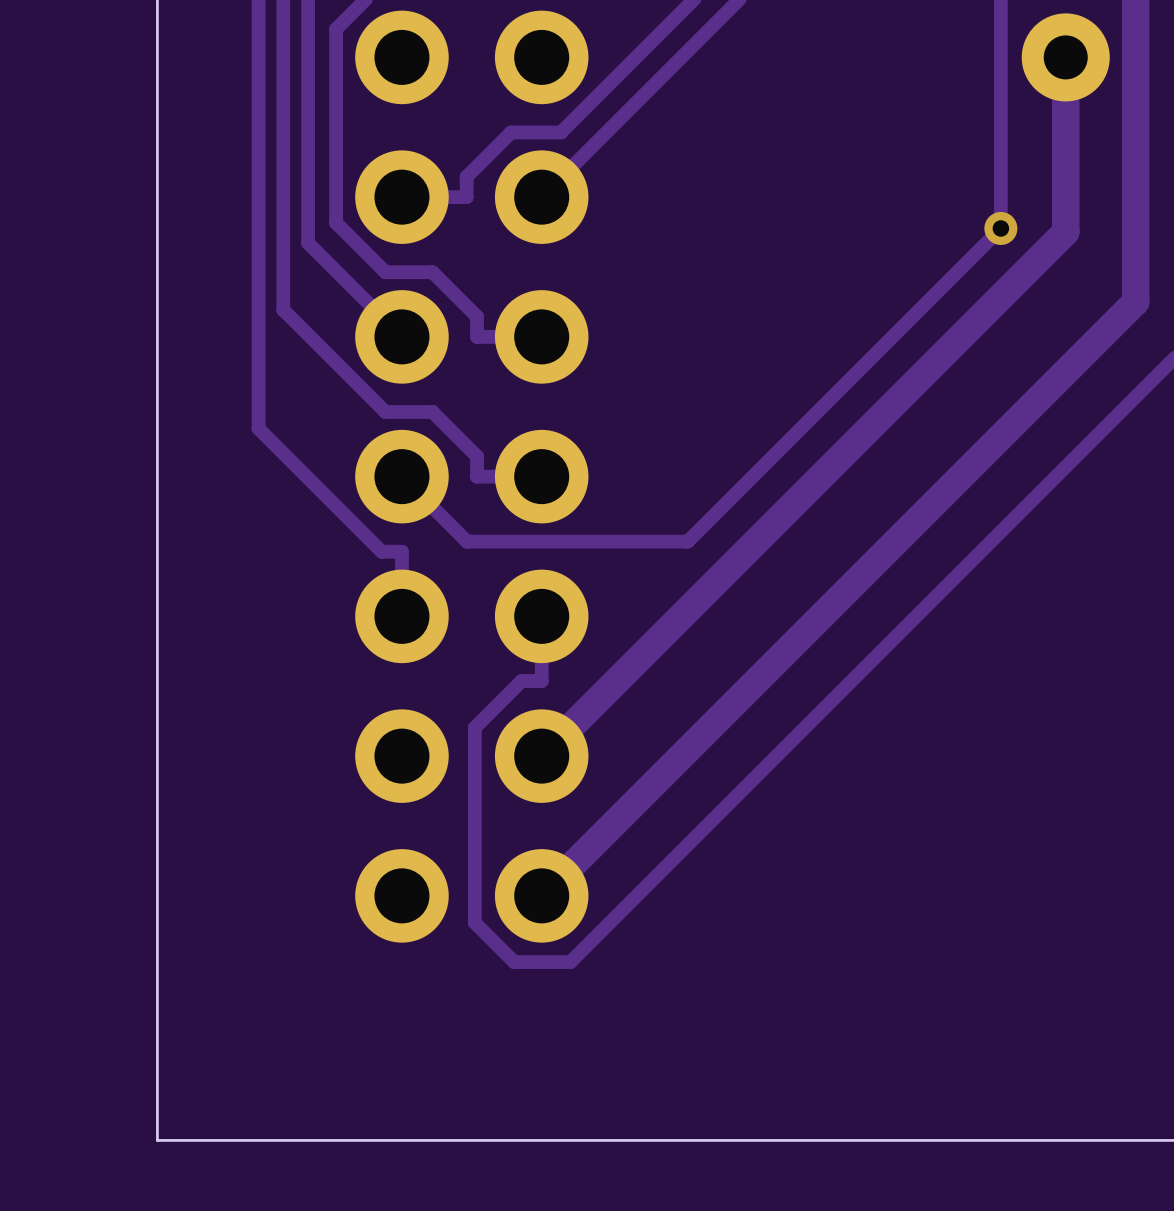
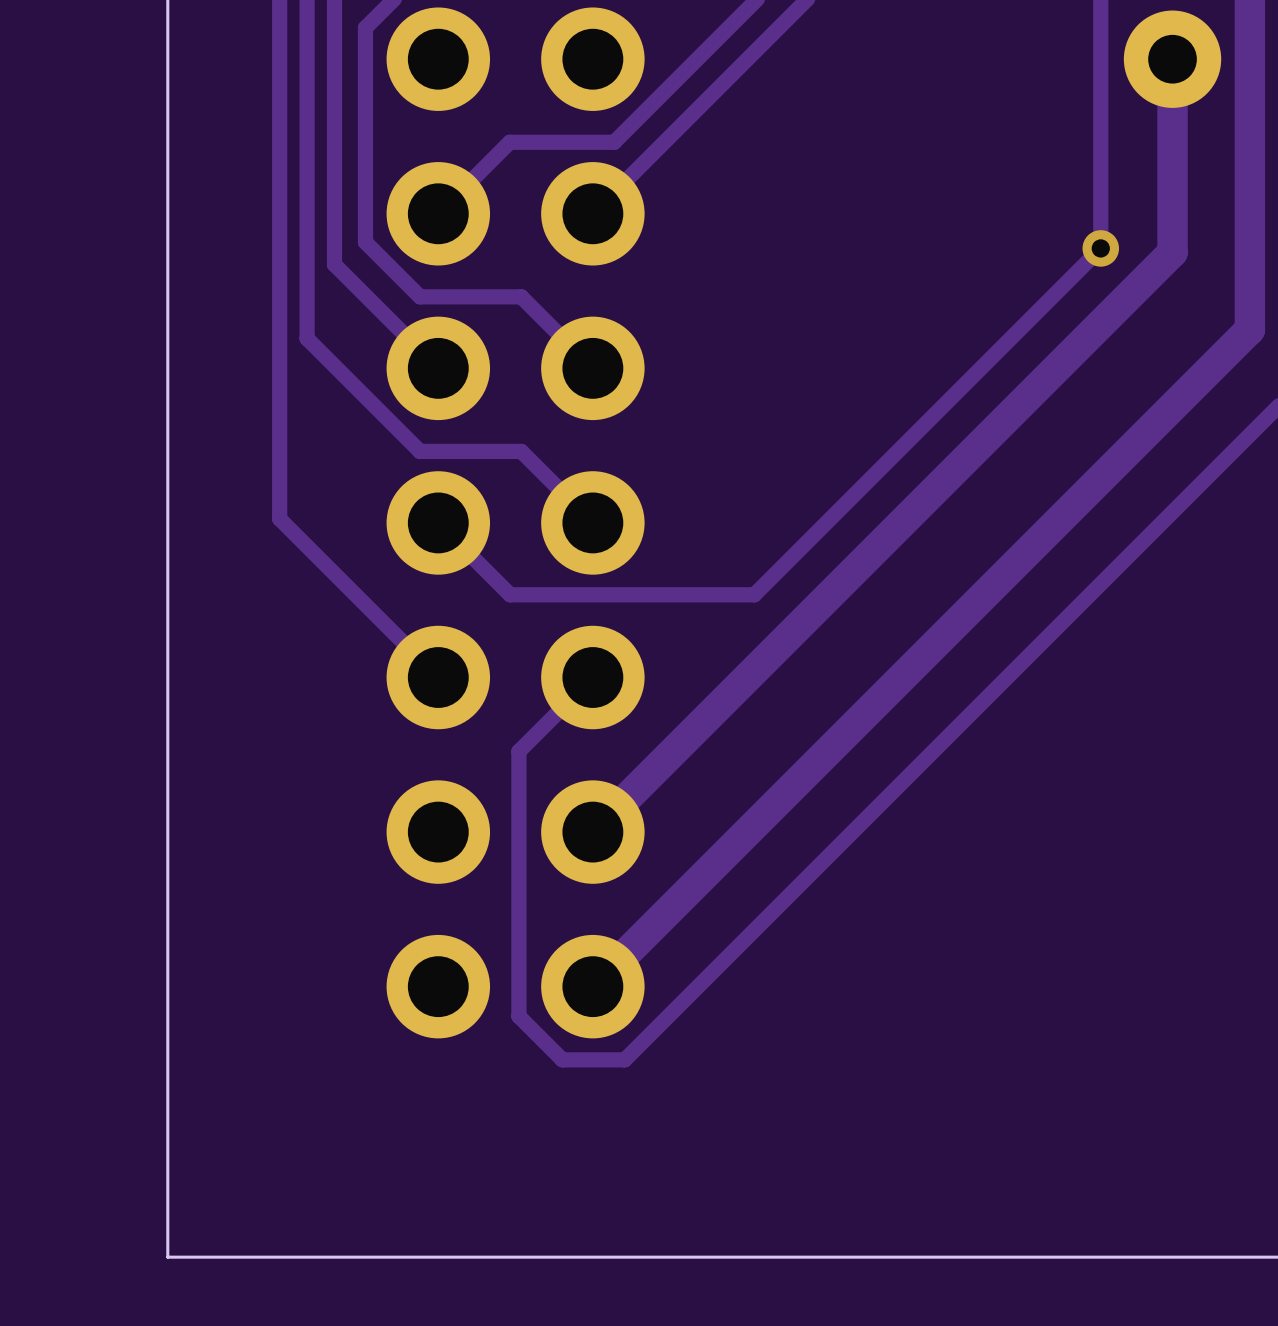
track: (511, 132) (466, 176) (466, 197) (401, 197) -> (558, 142) (509, 142) (438, 213)
track: (432, 272) (477, 316) (477, 336) (541, 336) -> (472, 296) (521, 296) (592, 368)
track: (432, 411) (477, 456) (477, 476) (541, 476) -> (472, 451) (521, 451) (592, 522)
track: (258, 428) (381, 551) (401, 551) (401, 616) -> (279, 469) (279, 518) (438, 677)
track: (541, 616) (541, 681) (521, 681) (474, 727) -> (592, 677) (518, 751) (518, 800)

